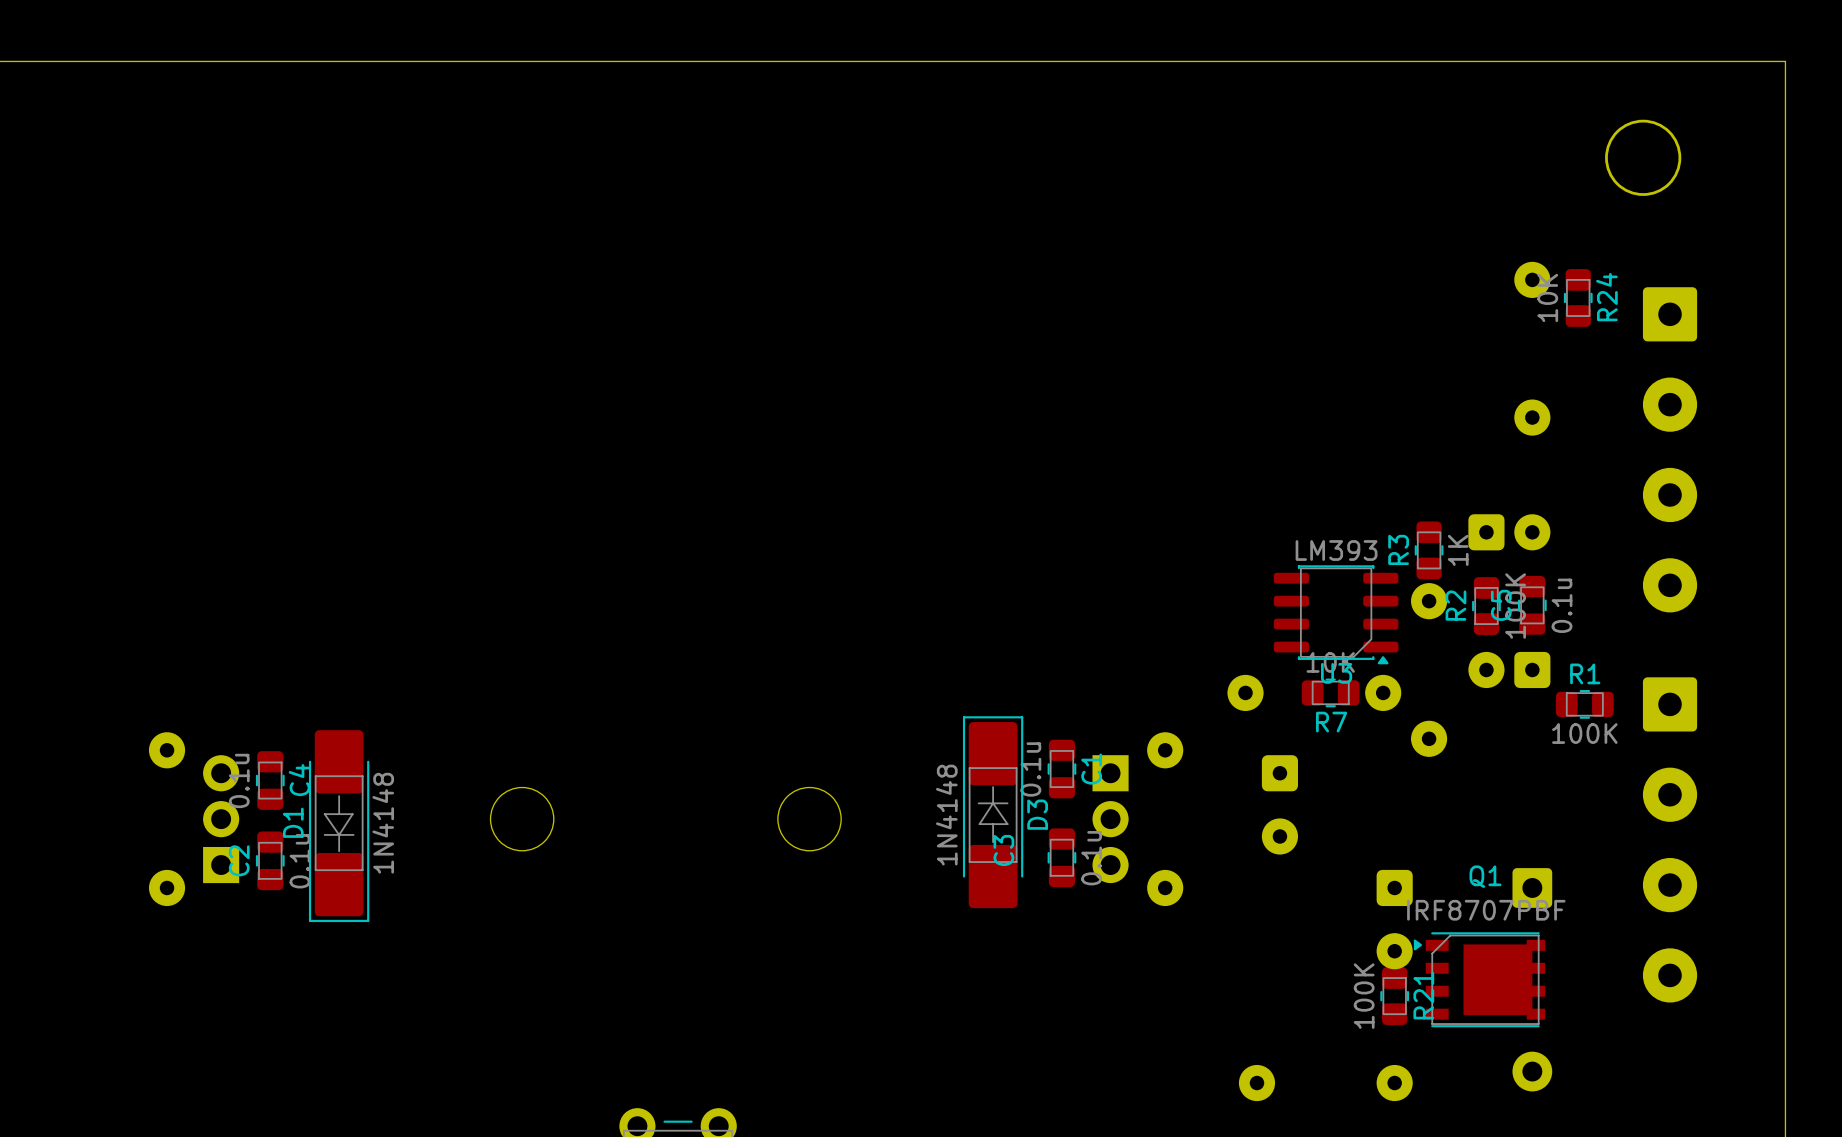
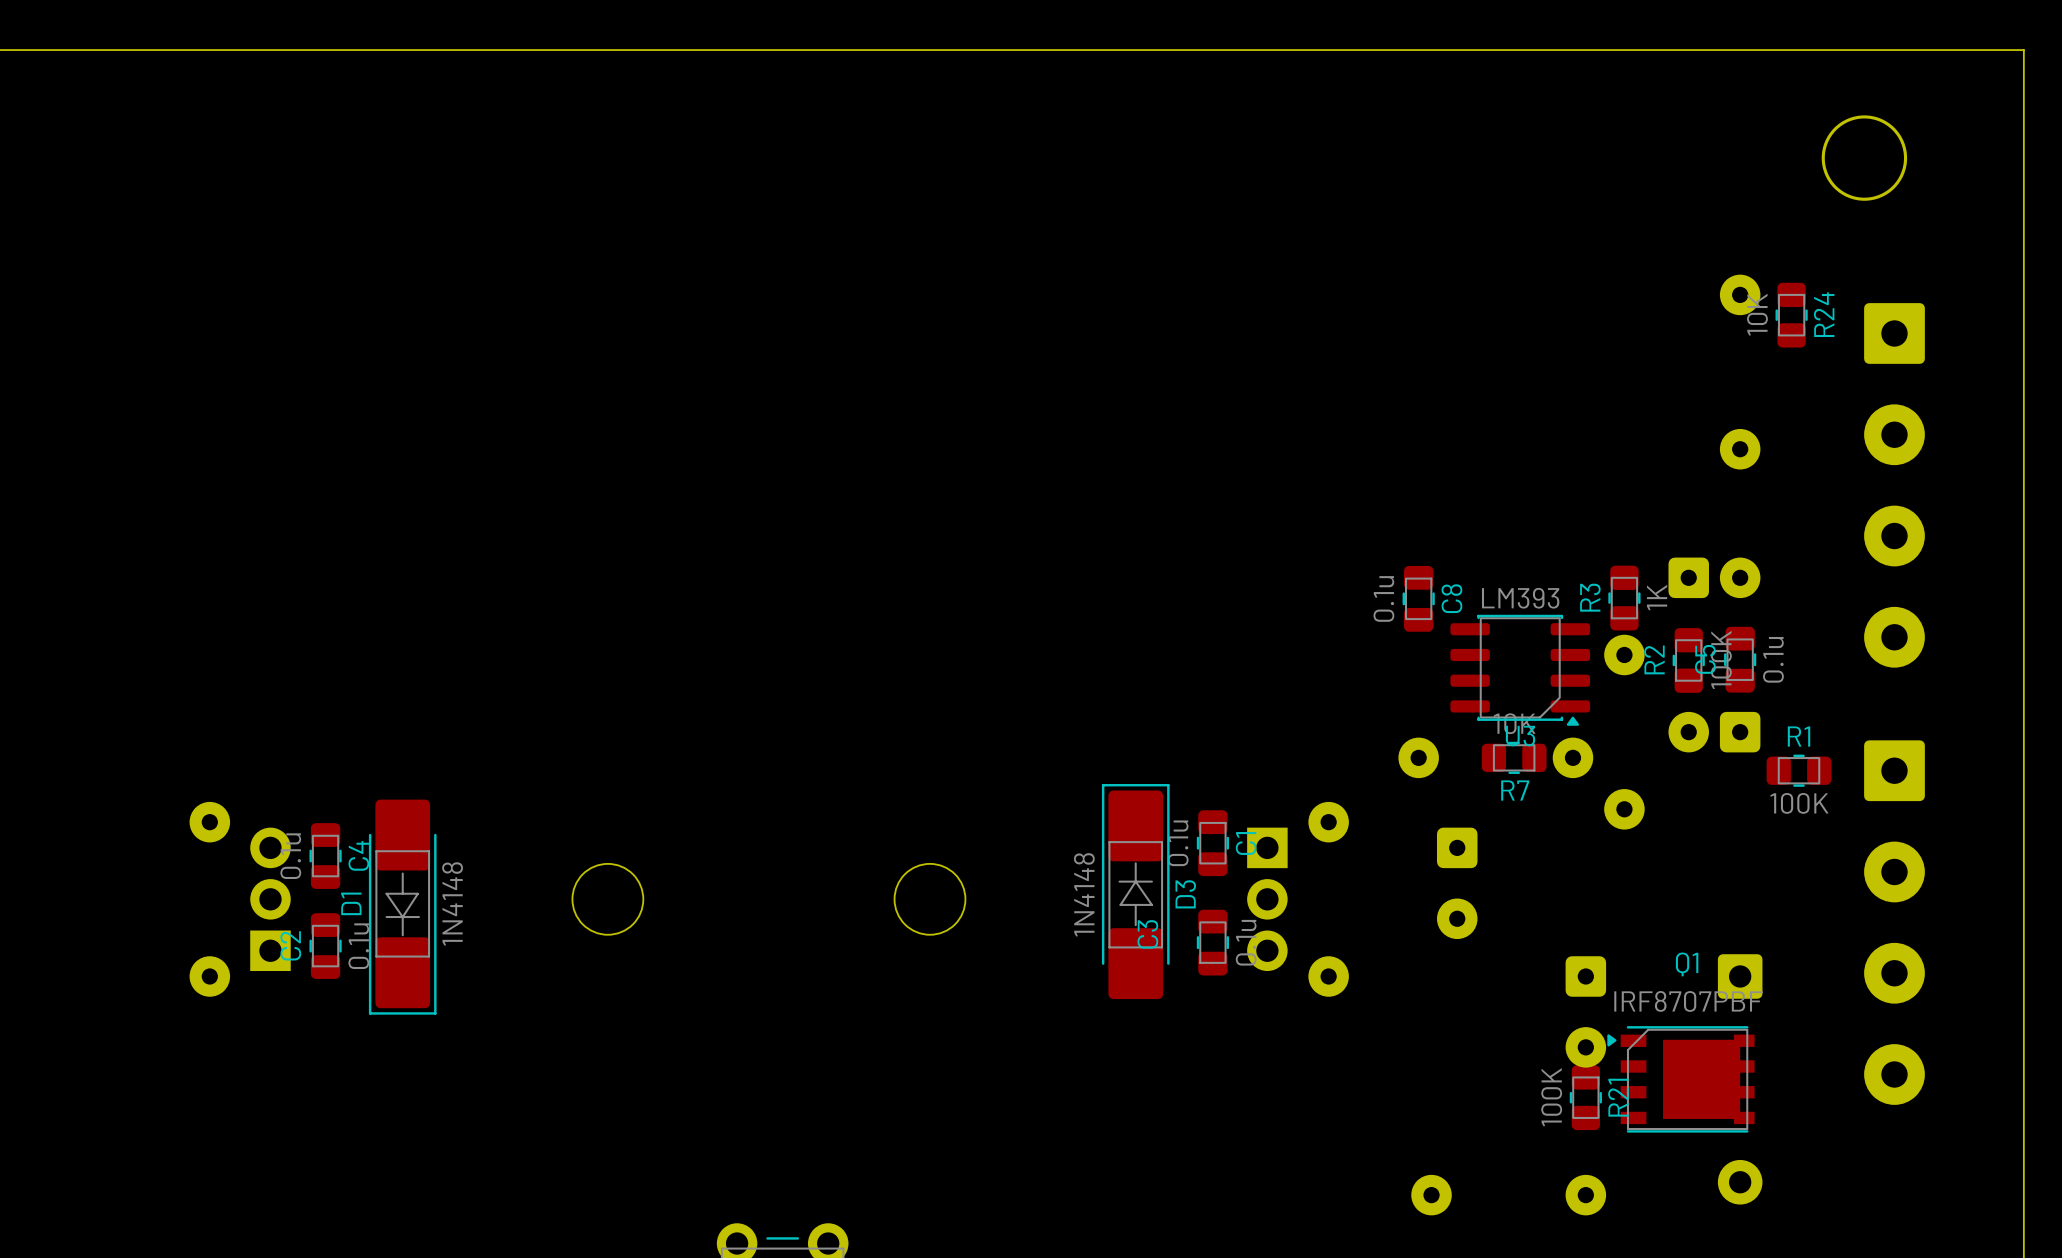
C8: none -> 0.1u (1418, 598)

